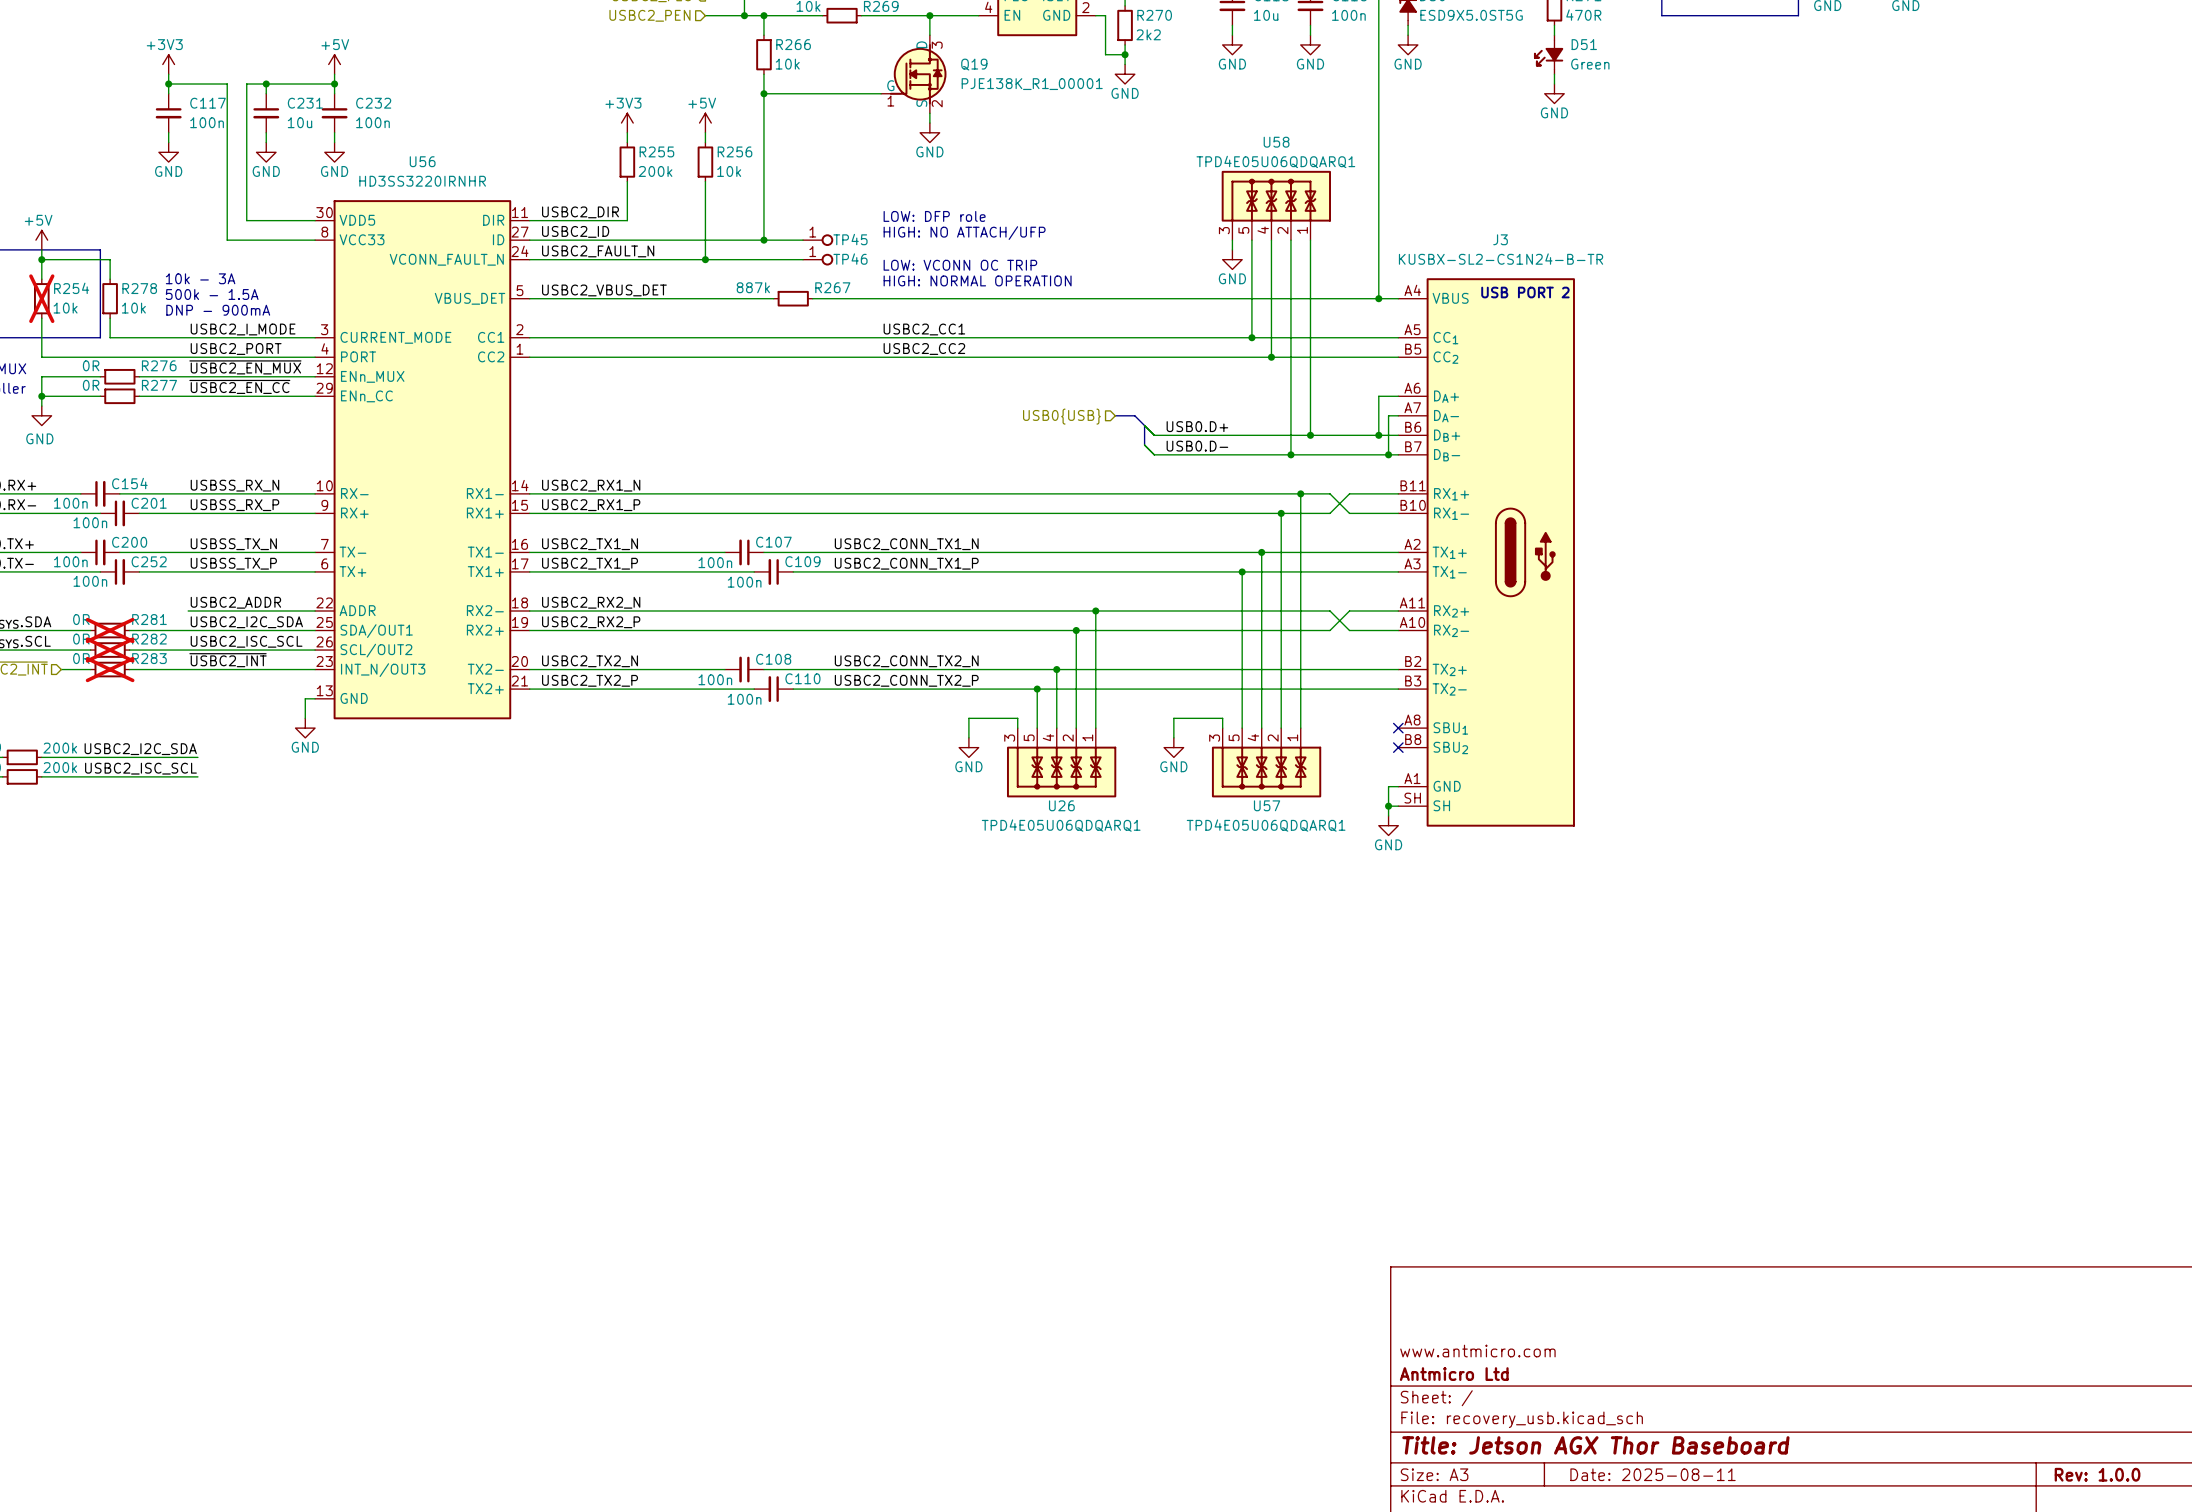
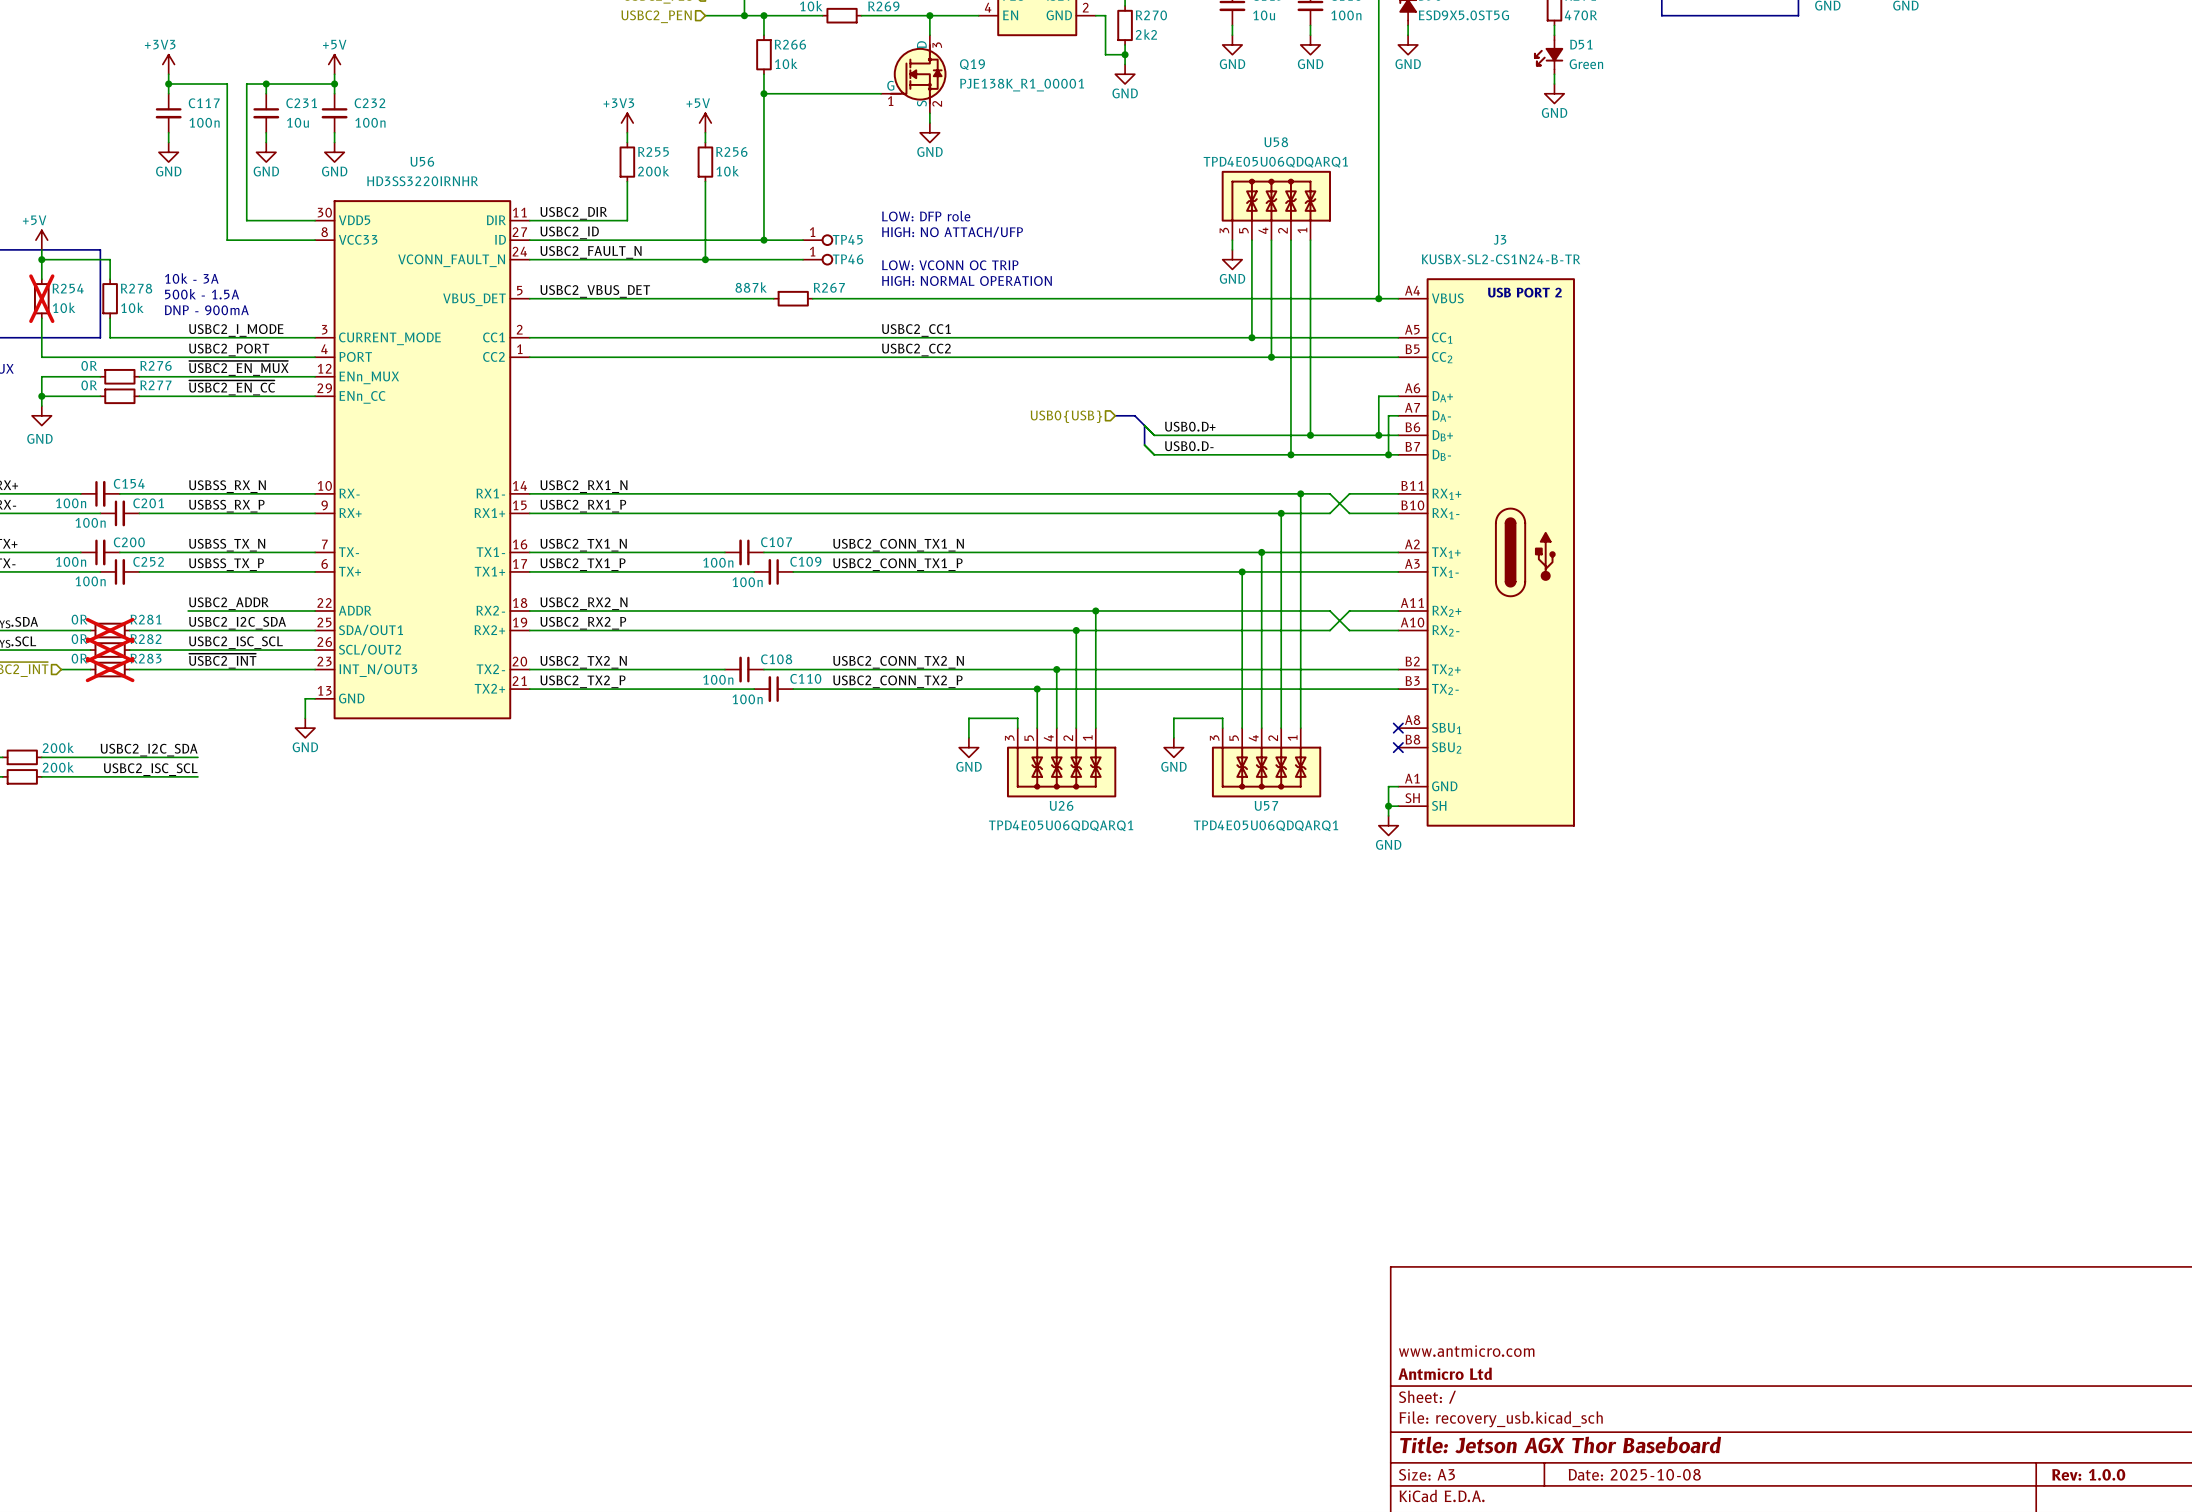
title block: Date: 2025-08-11 (1653, 1474) -> Date: 2025-10-08 (1634, 1474)

